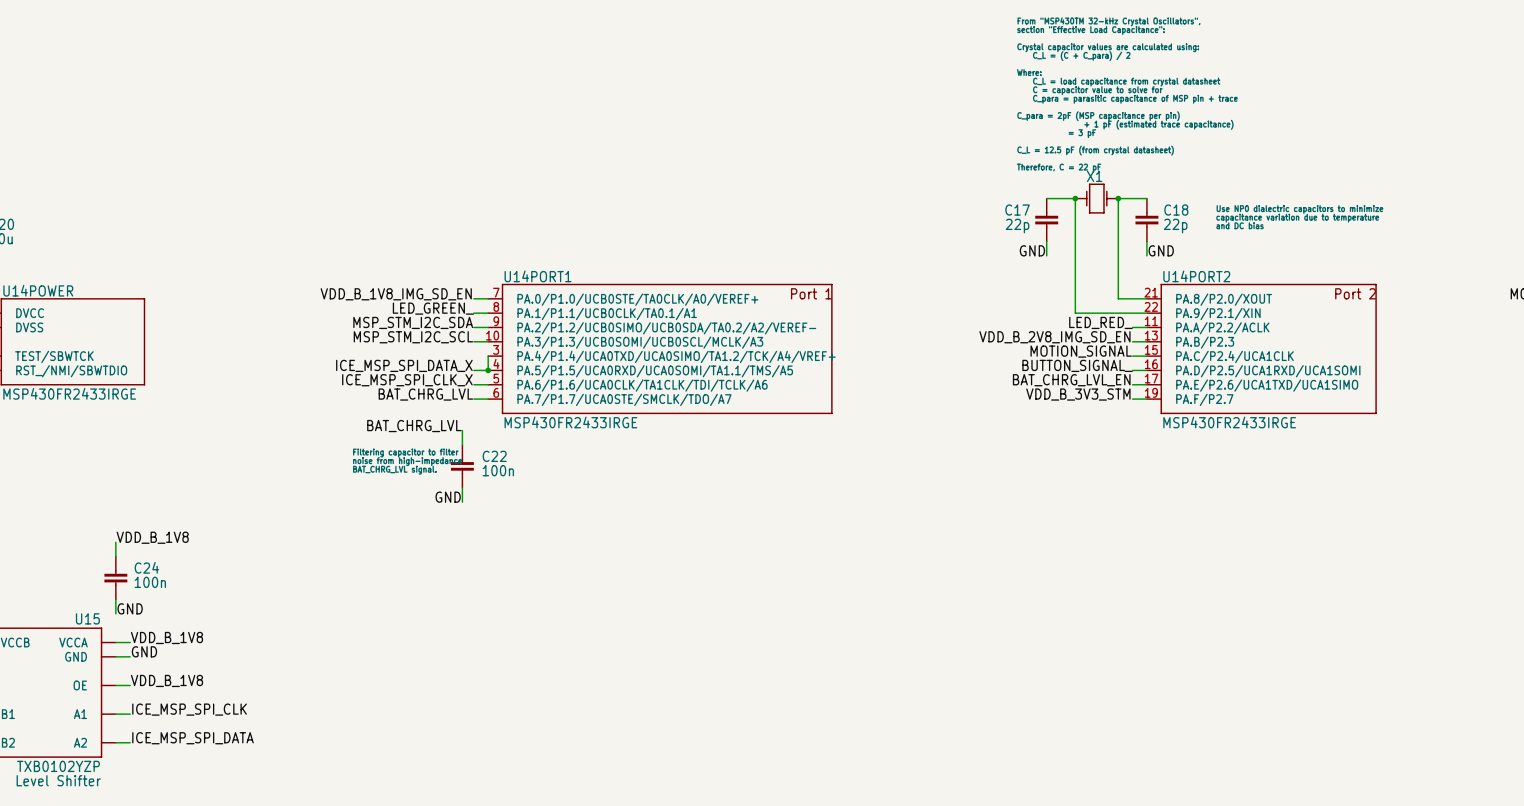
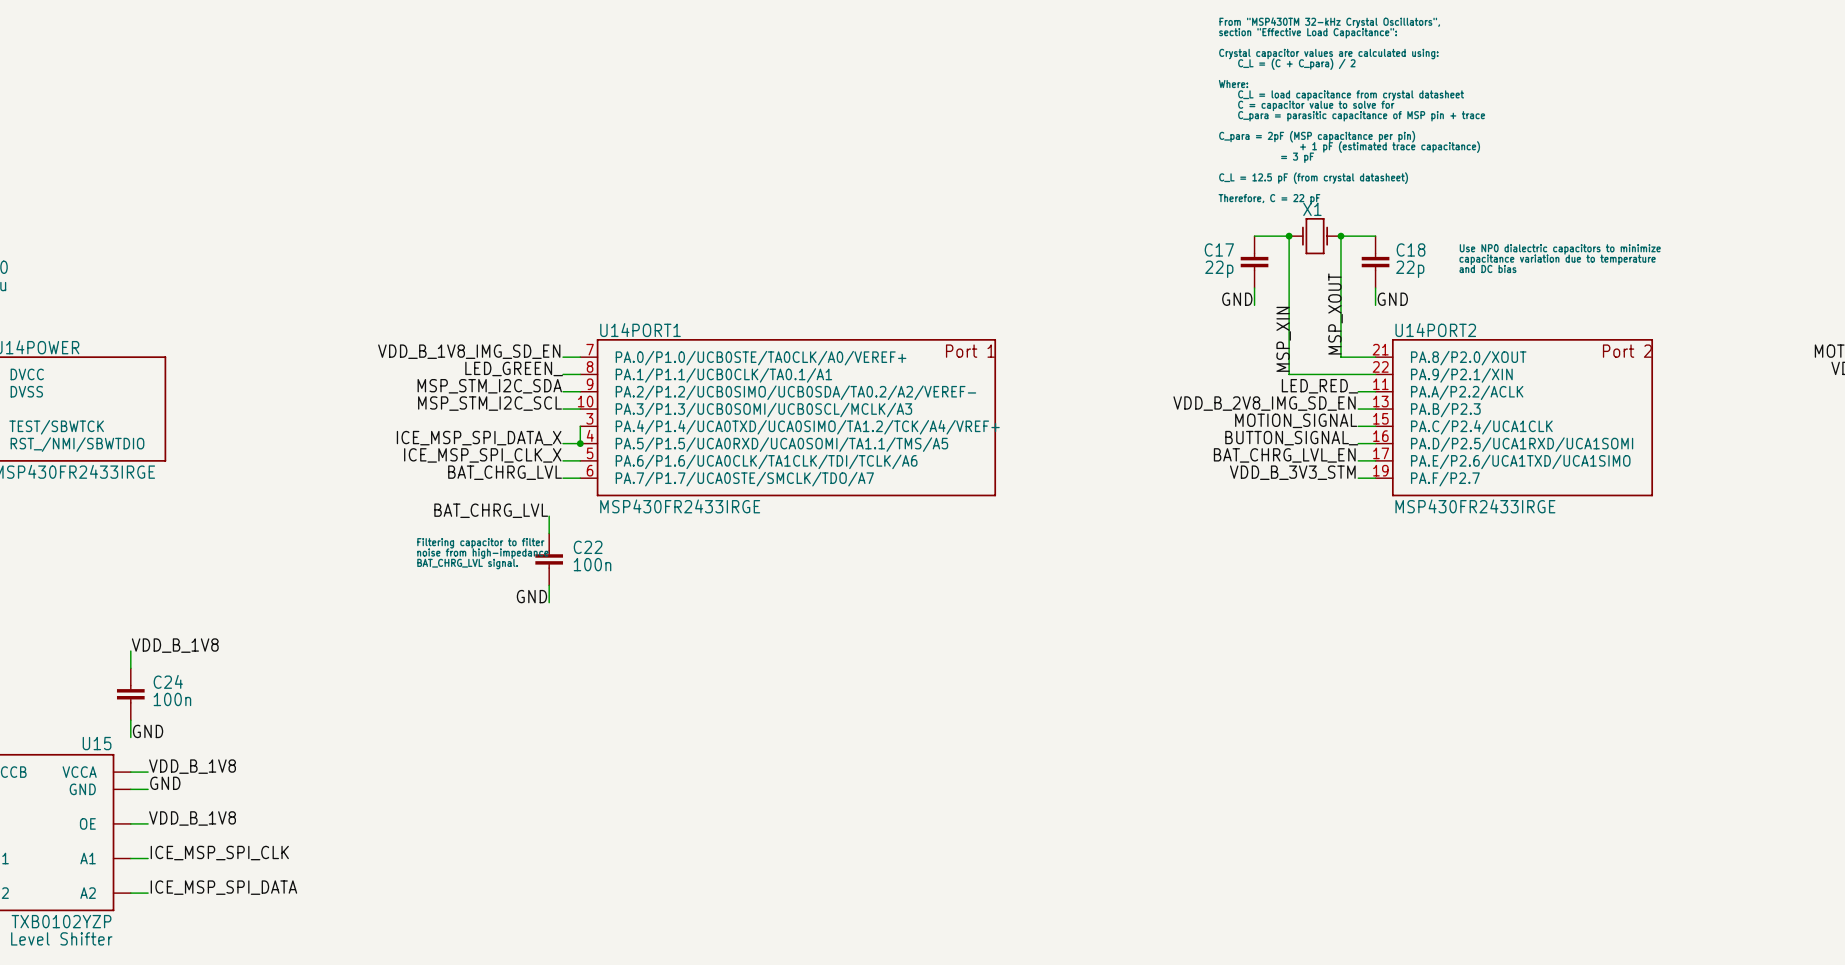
label: none -> MSP_XOUT (1335, 313)
label: none -> MSP_XIN (1283, 339)

